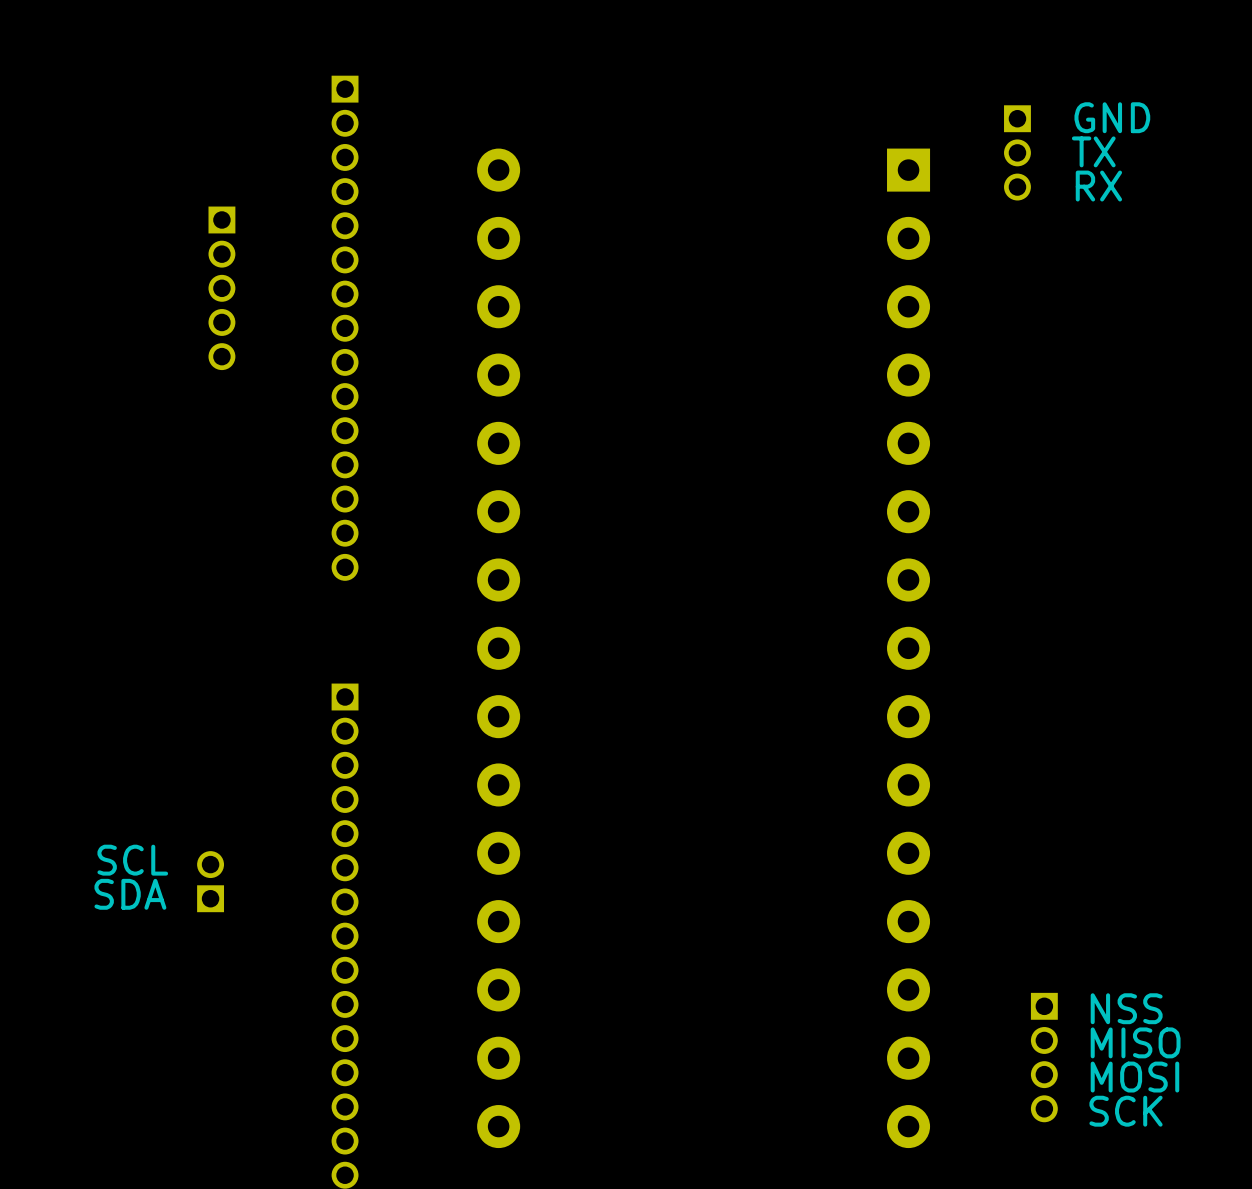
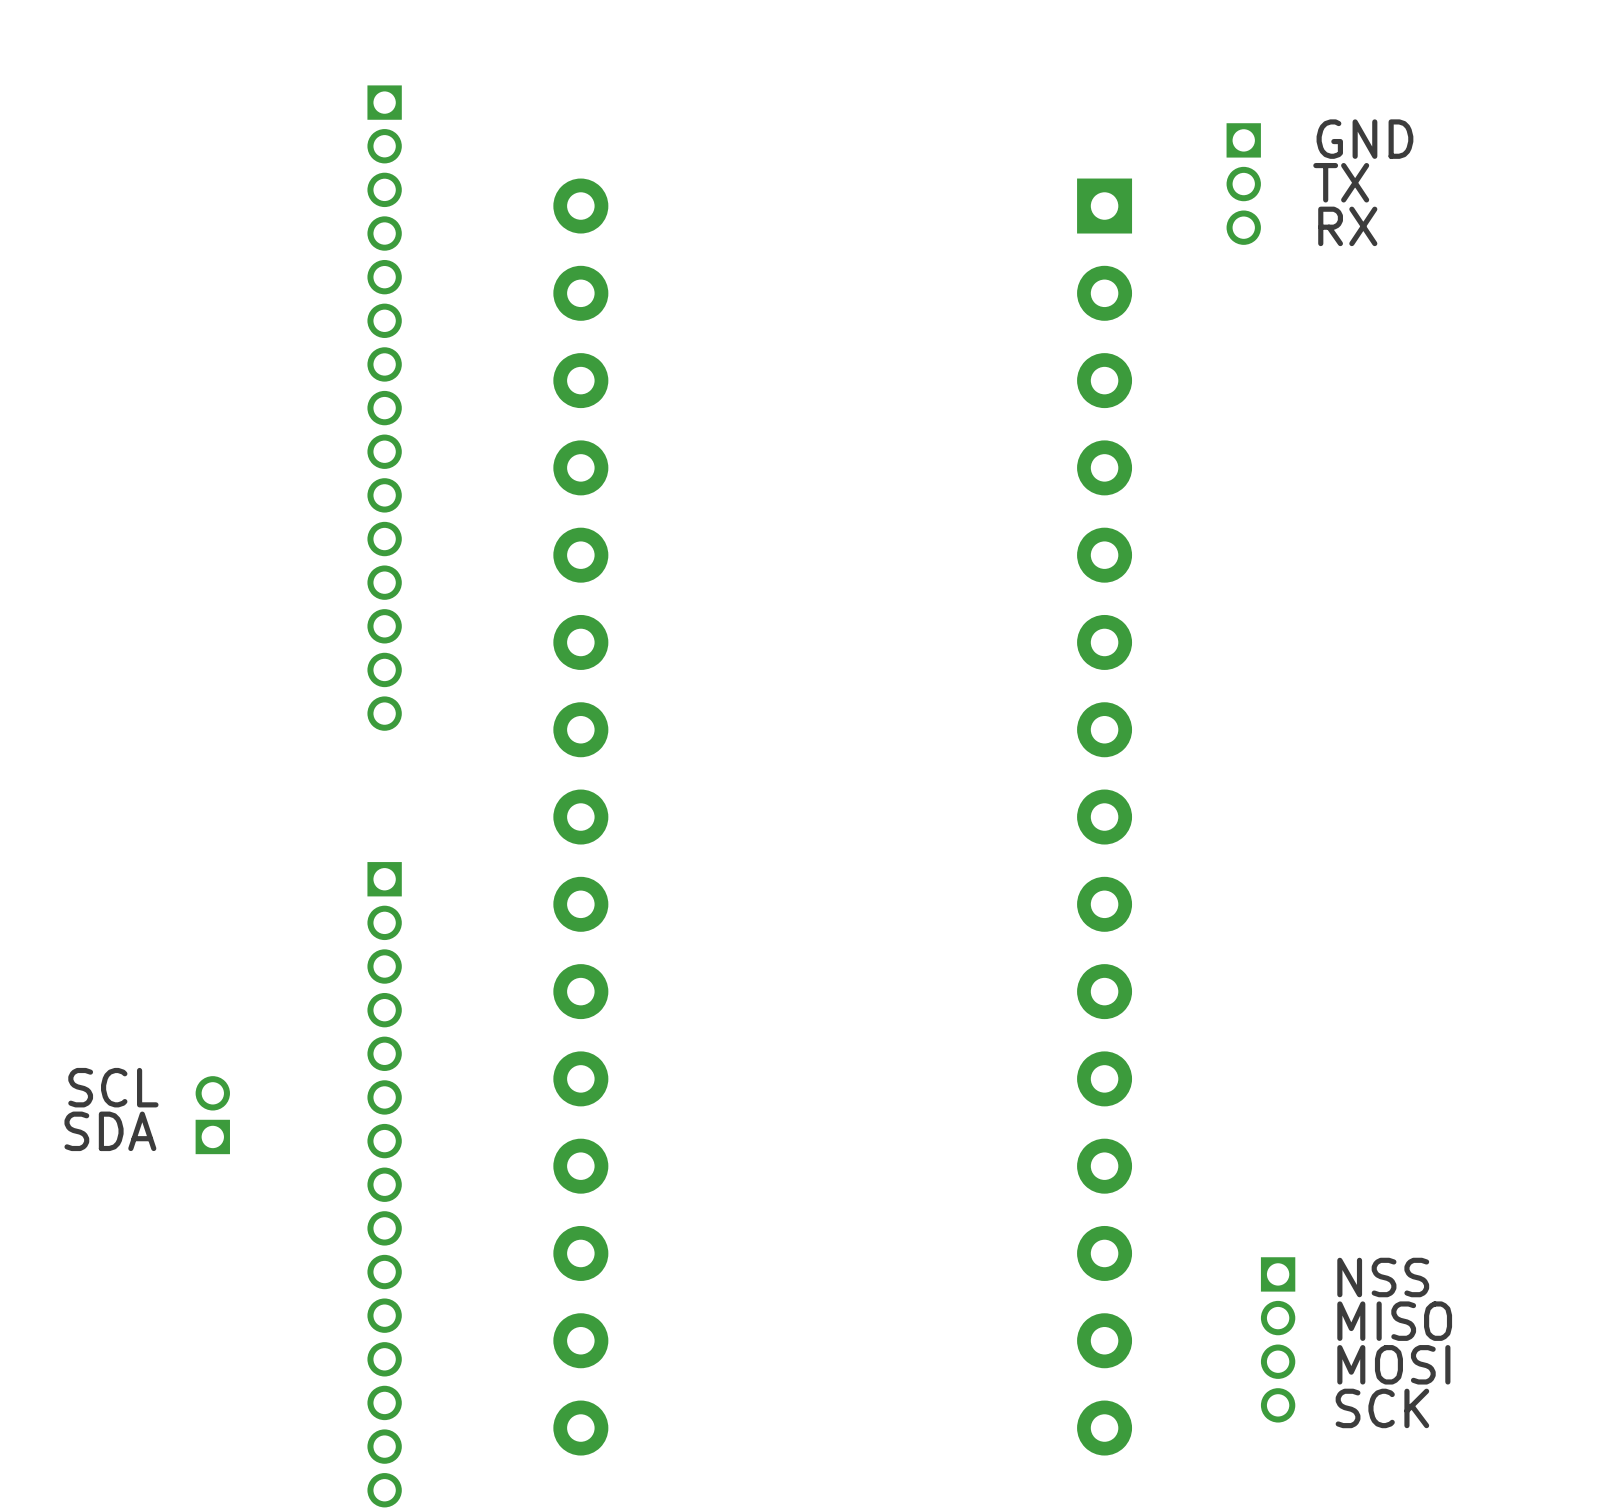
part: (221, 288) -> none

